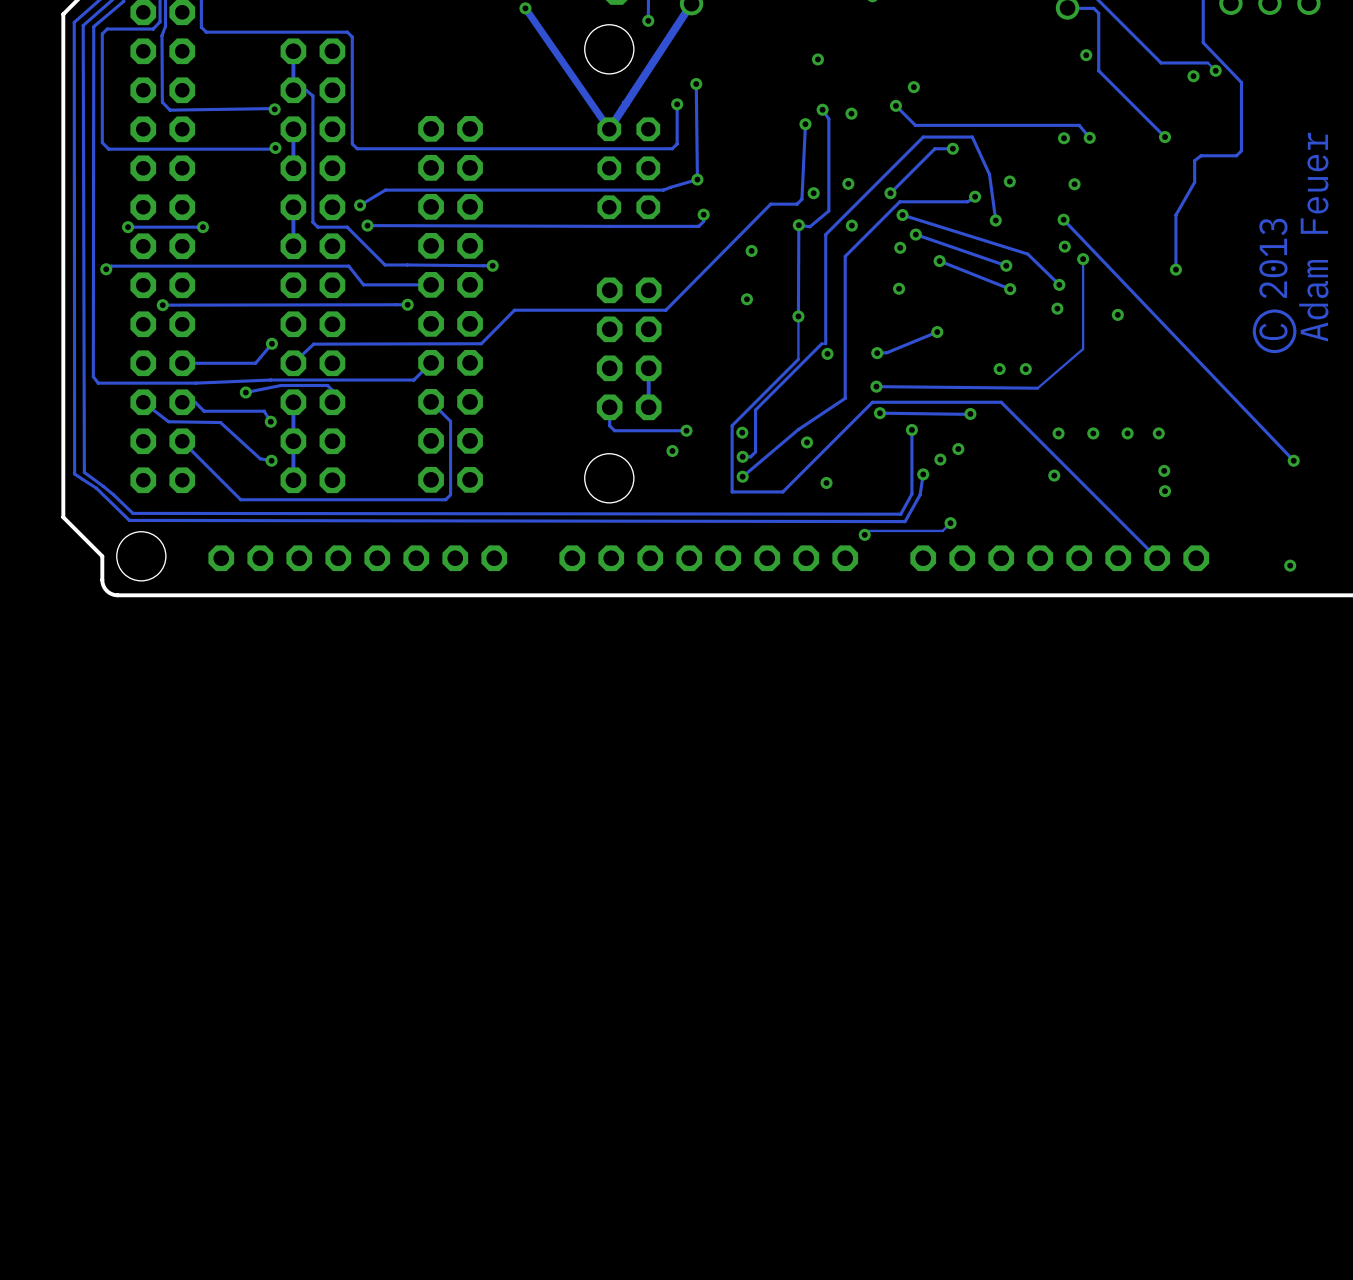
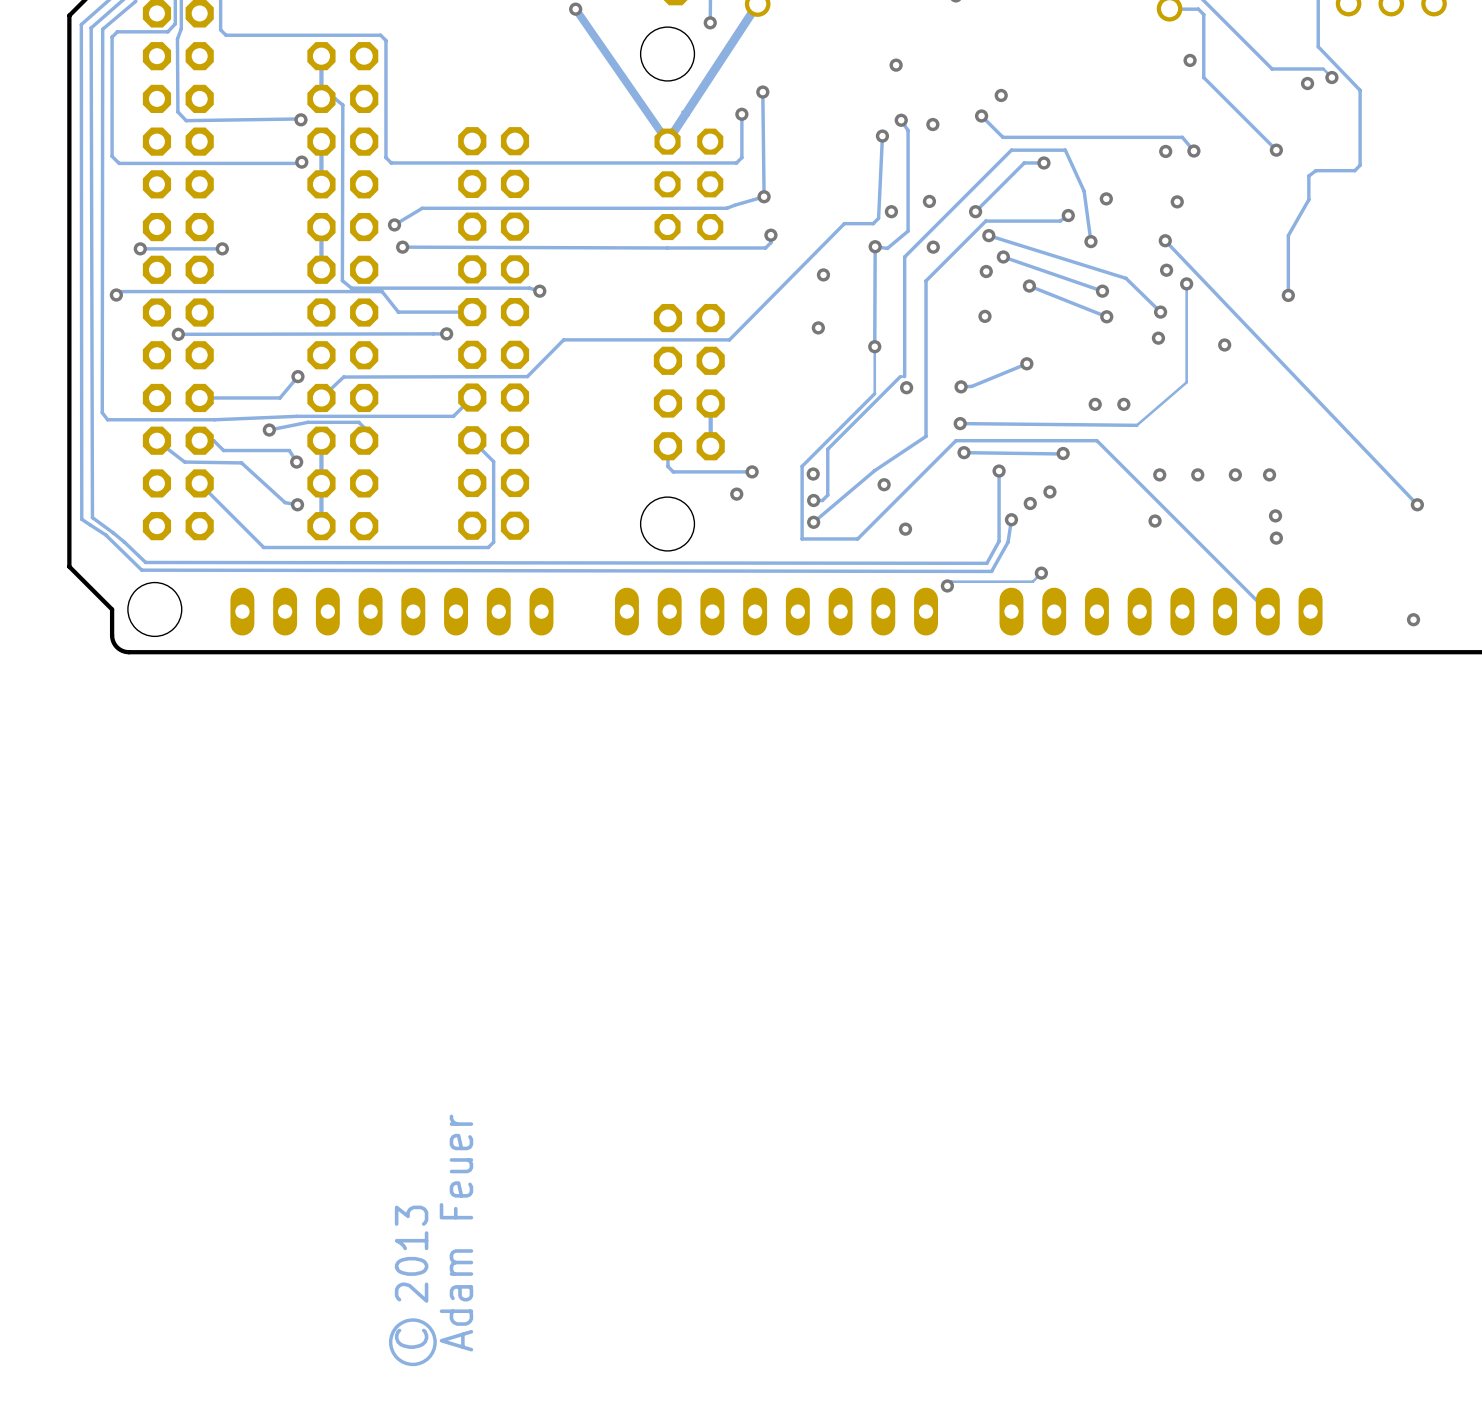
track: (312, 95) (312, 222) (317, 227) (347, 227) (385, 264) (492, 265) -> (342, 105) (342, 280) (351, 288) (529, 288) (539, 291)
text: Adam Feuer (1313, 237) -> none
text: C 2013 (1273, 279) -> none
drawing: [1252, 309, 1297, 354] -> none
part footprint: [208, 545, 508, 572] -> [230, 587, 554, 636]
part footprint: [559, 545, 859, 572] -> [614, 587, 938, 636]
part footprint: [910, 545, 1210, 572] -> [999, 587, 1323, 636]
text: none -> Adam Feuer (456, 1233)
text: none -> C 2013 (411, 1277)
drawing: none -> [388, 1318, 437, 1367]

